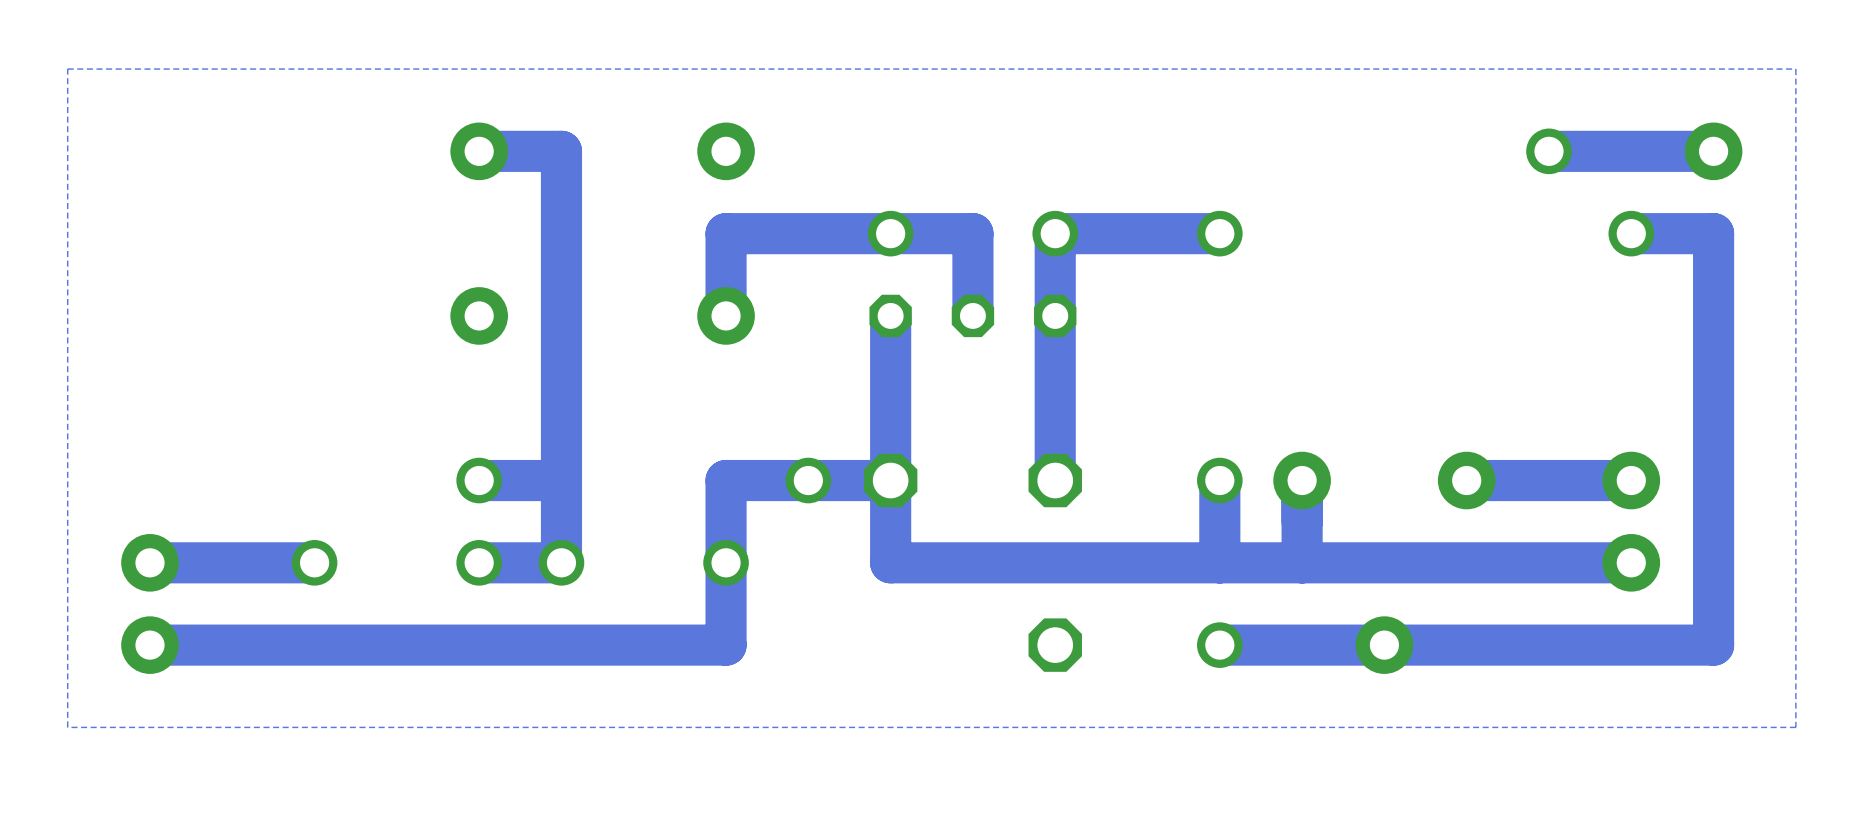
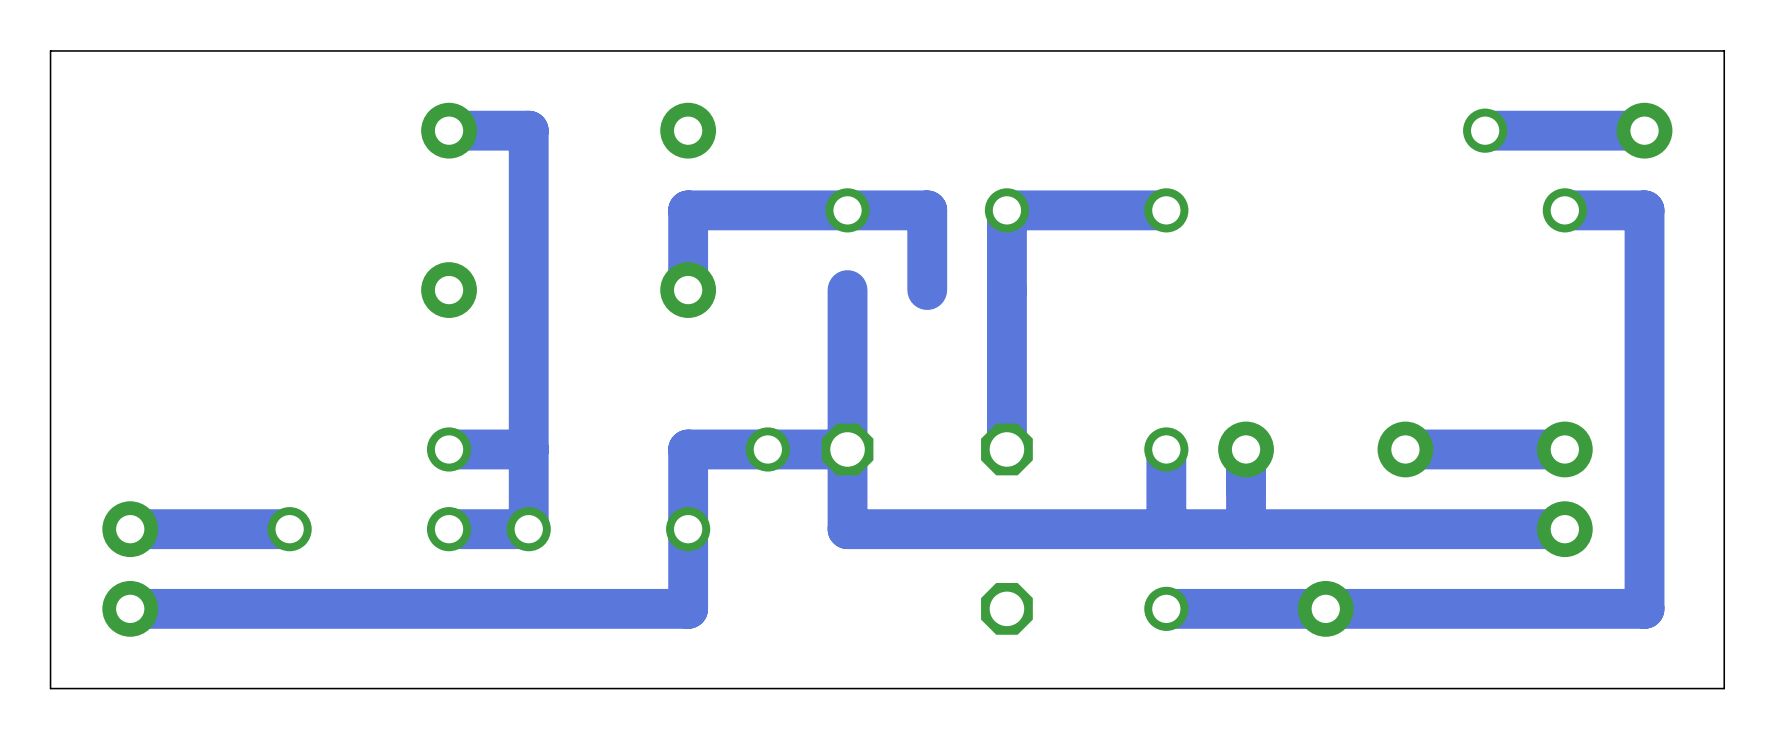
bottom zone outline: (1795, 69) (1795, 727) (67, 727) (67, 69) (1795, 69) -> none
board edge: none -> (1724, 50) (50, 50) (50, 688) (1724, 688) (1724, 50)
part: (972, 315) -> none

